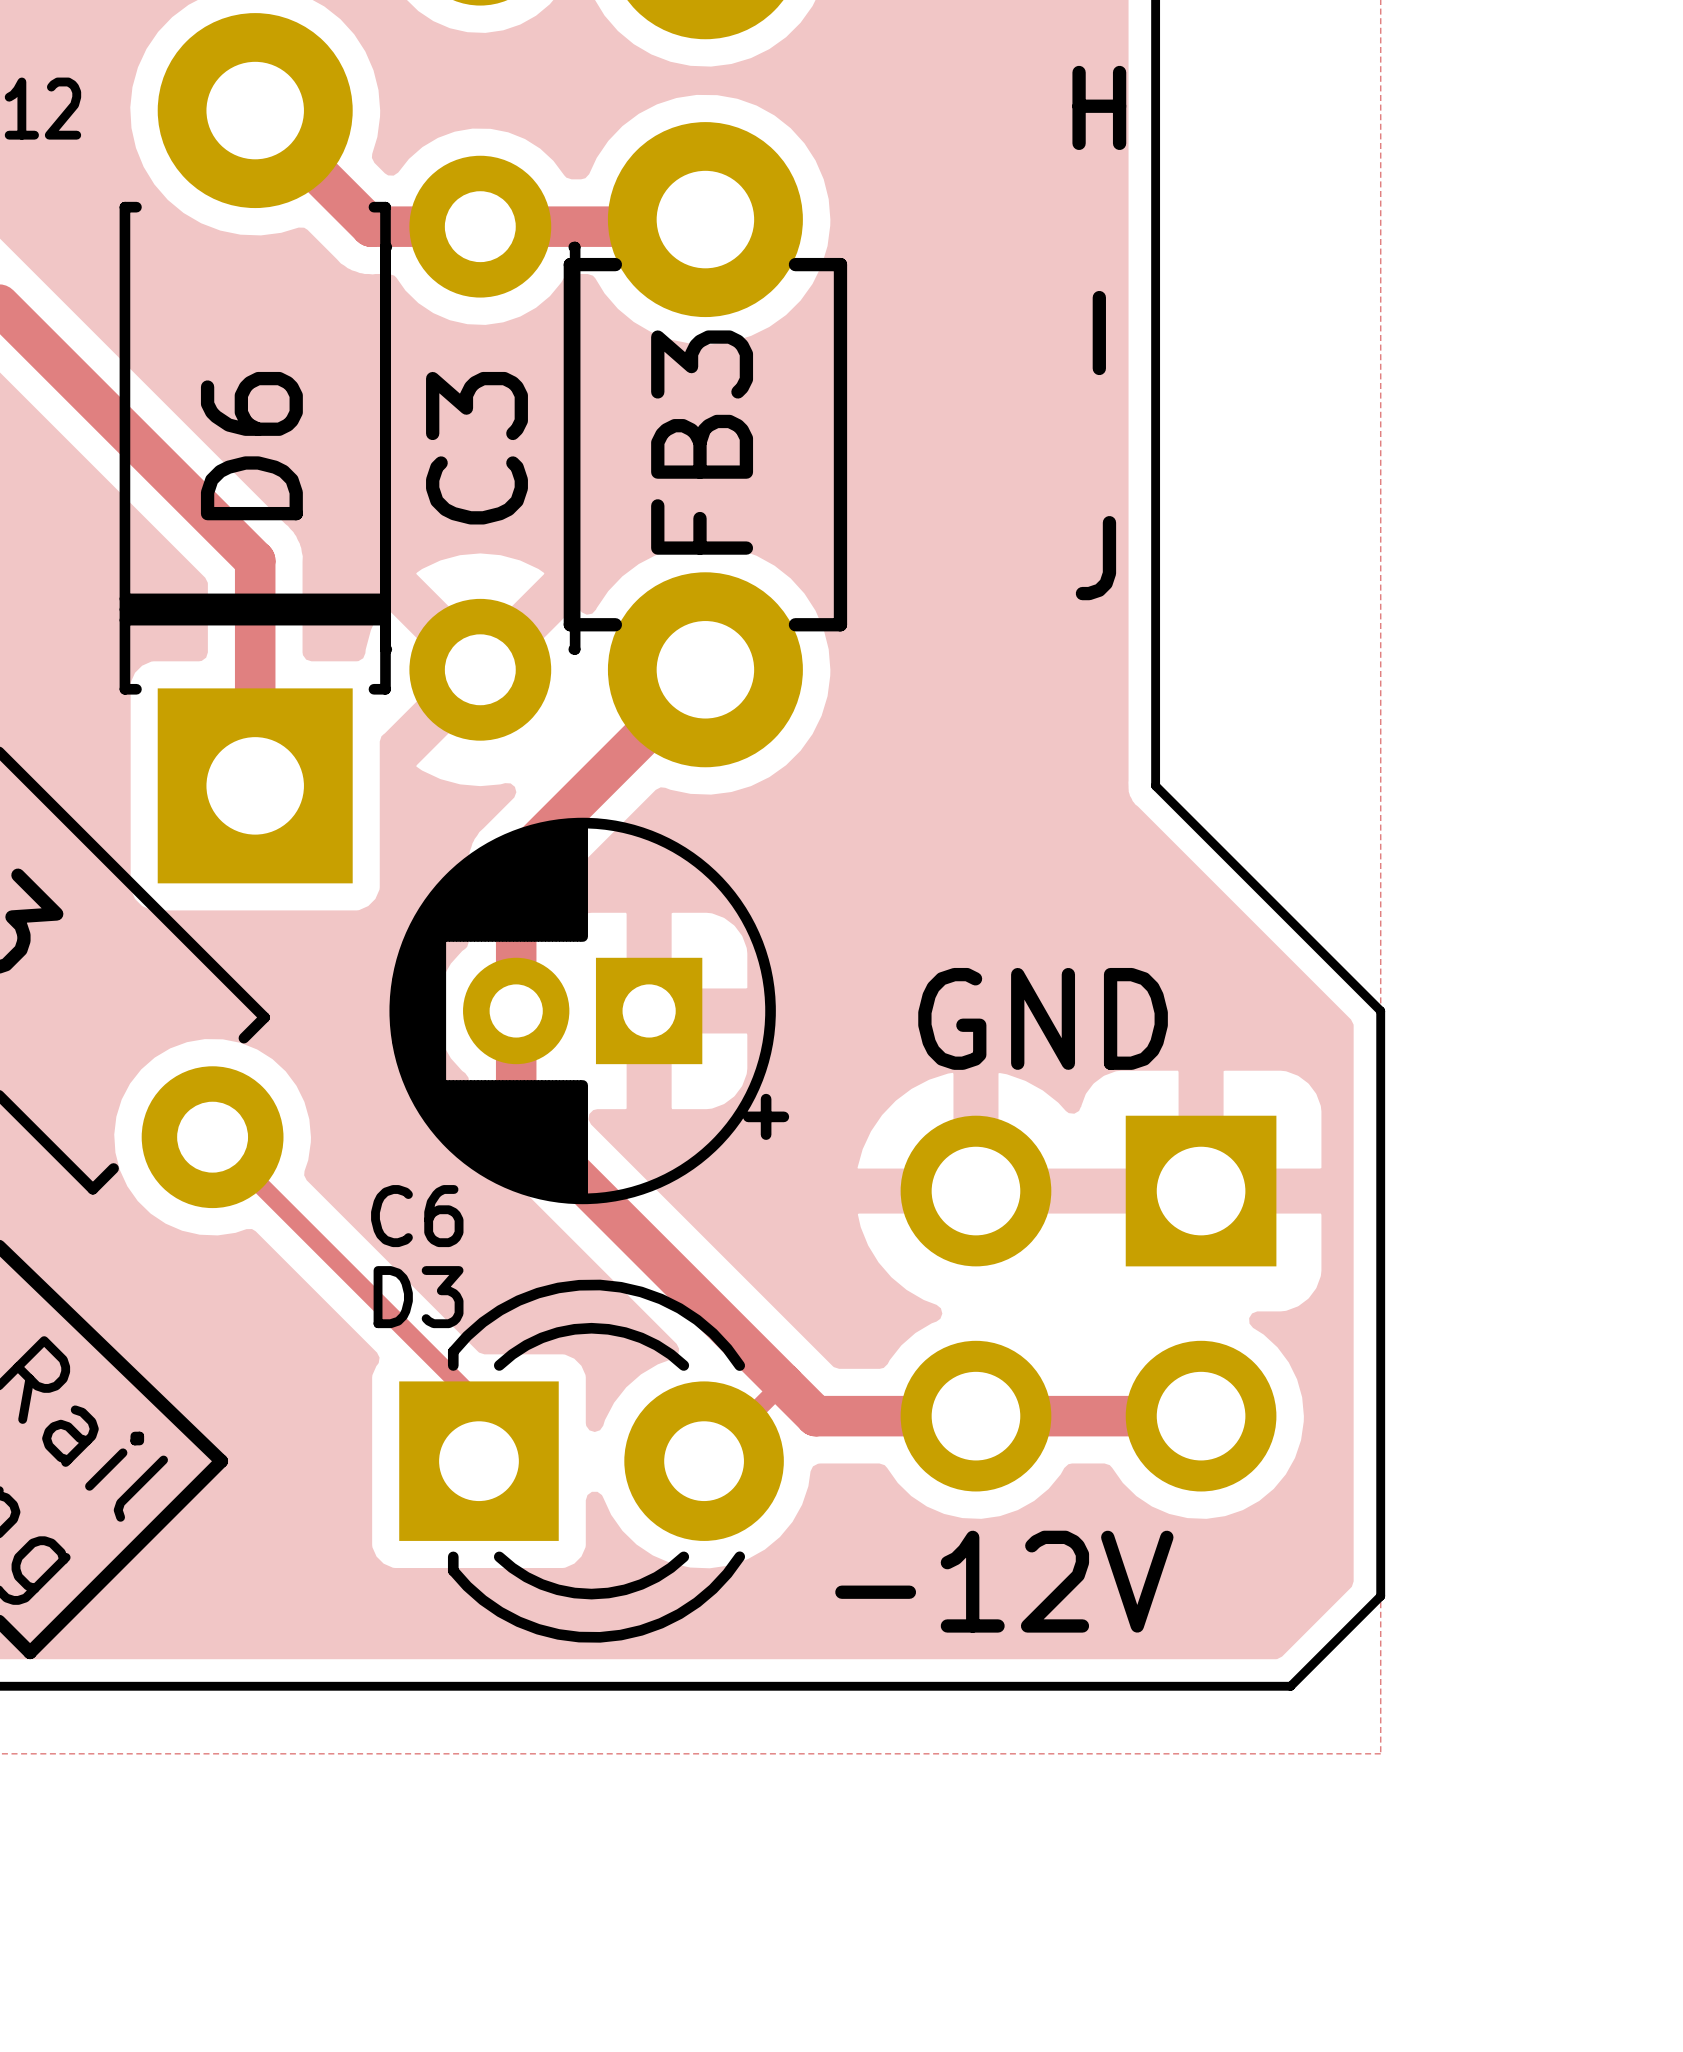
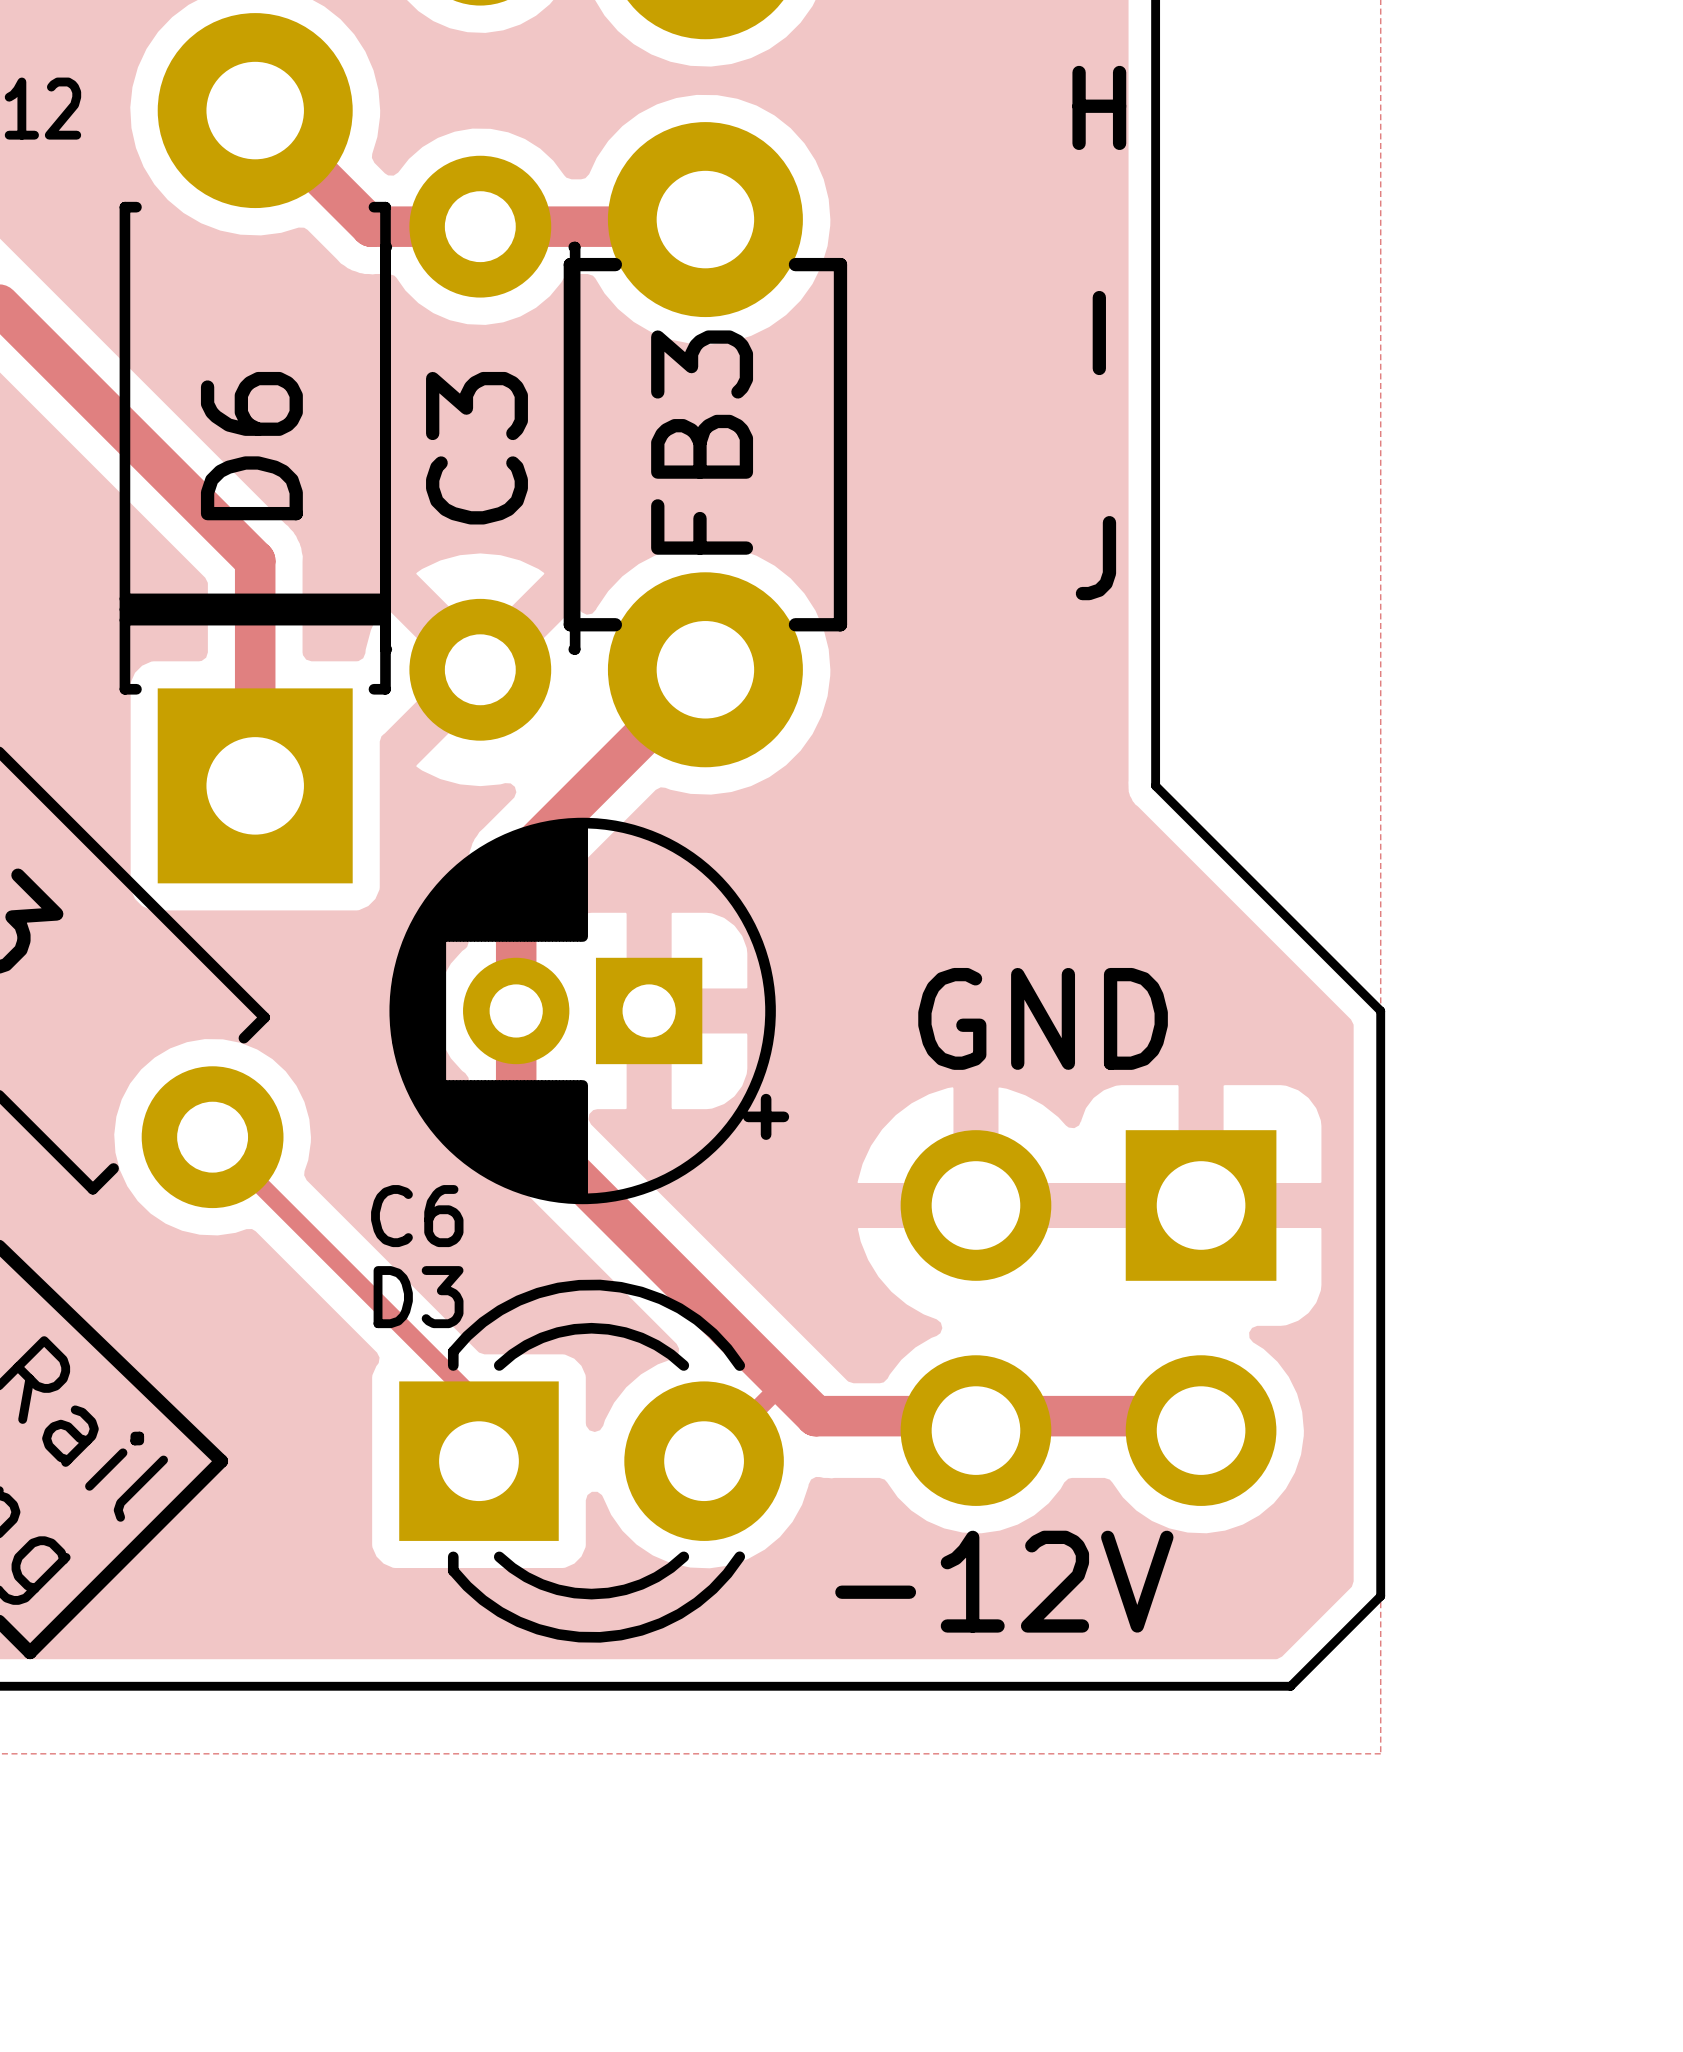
part position: (1088, 1303) -> (1088, 1318)

